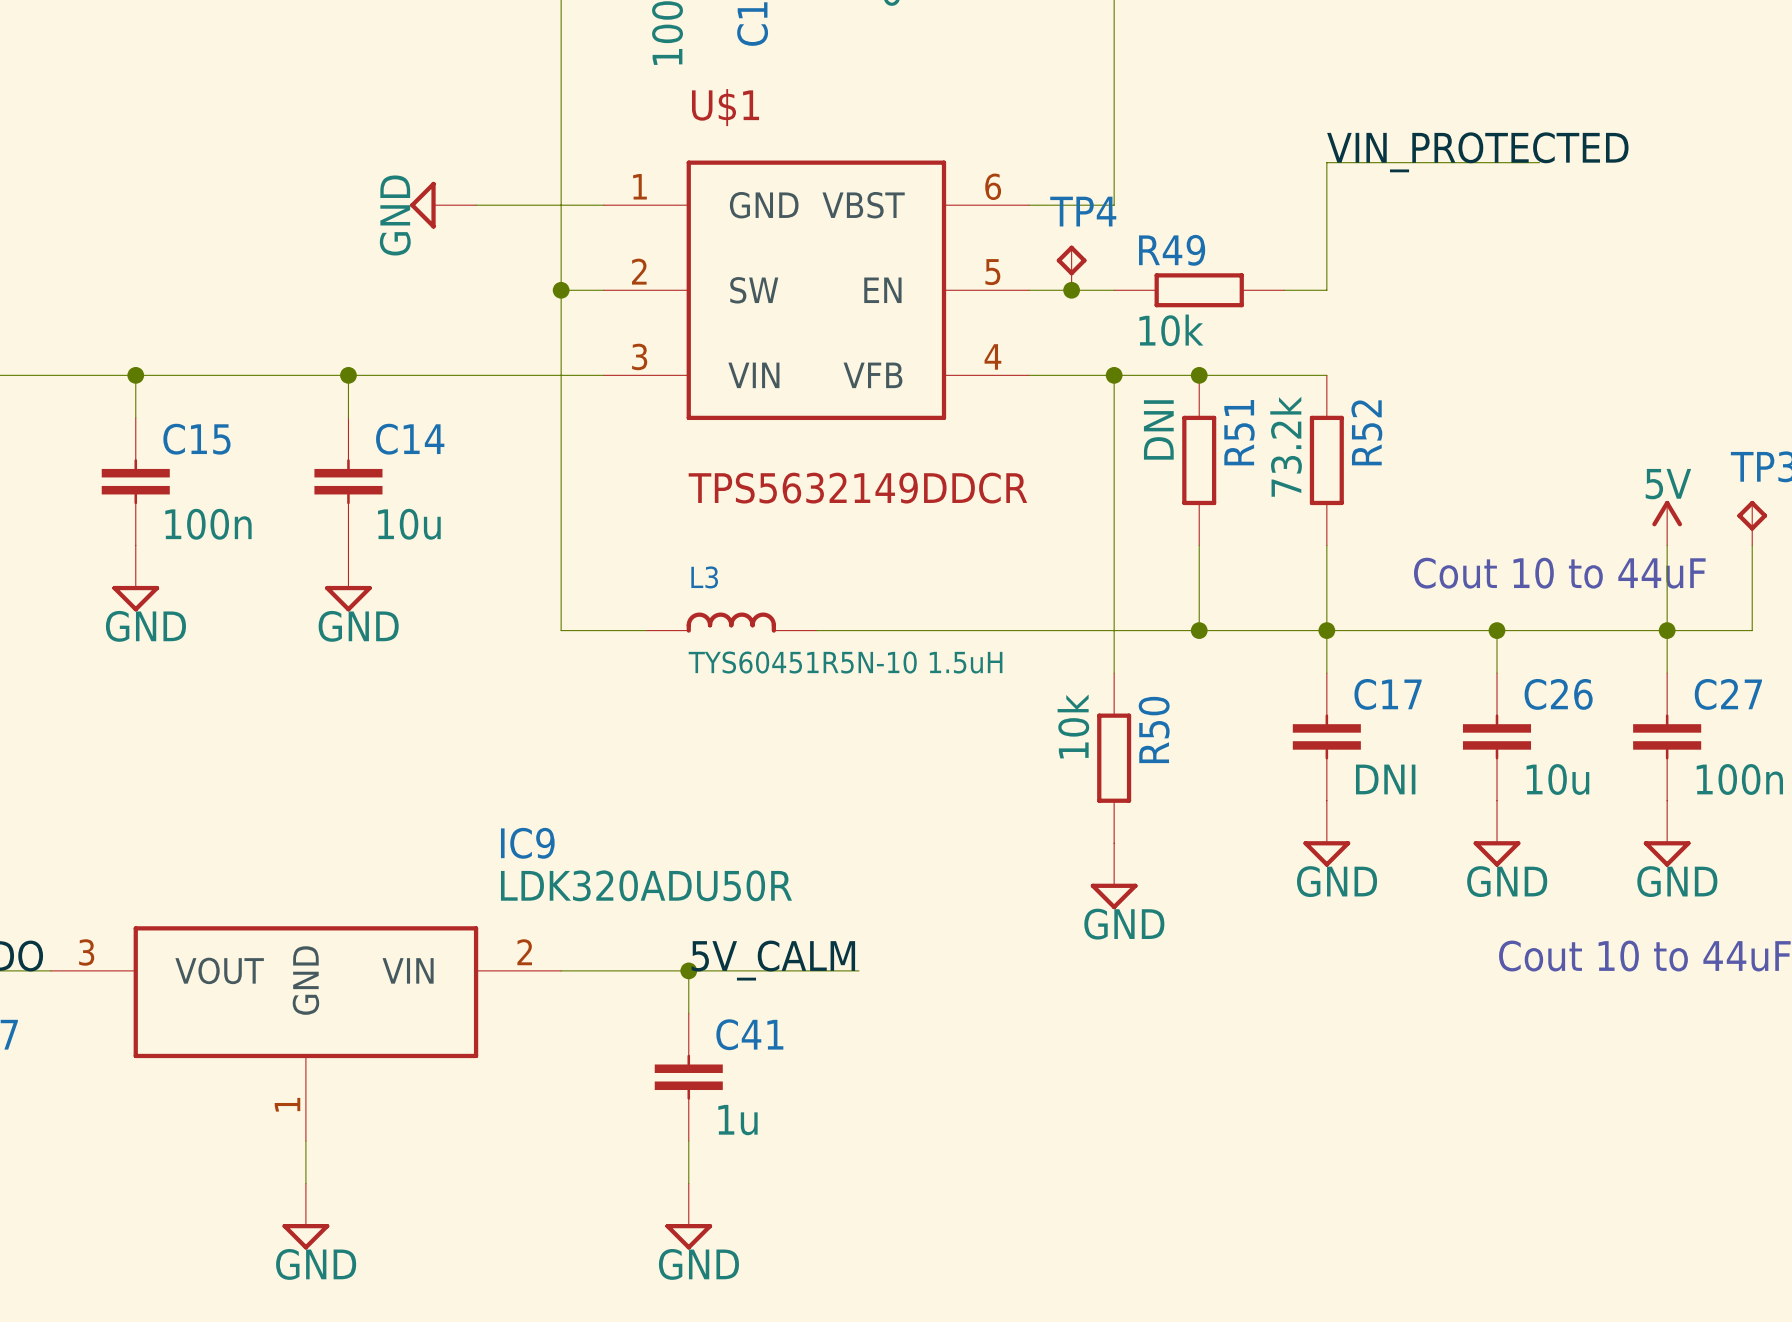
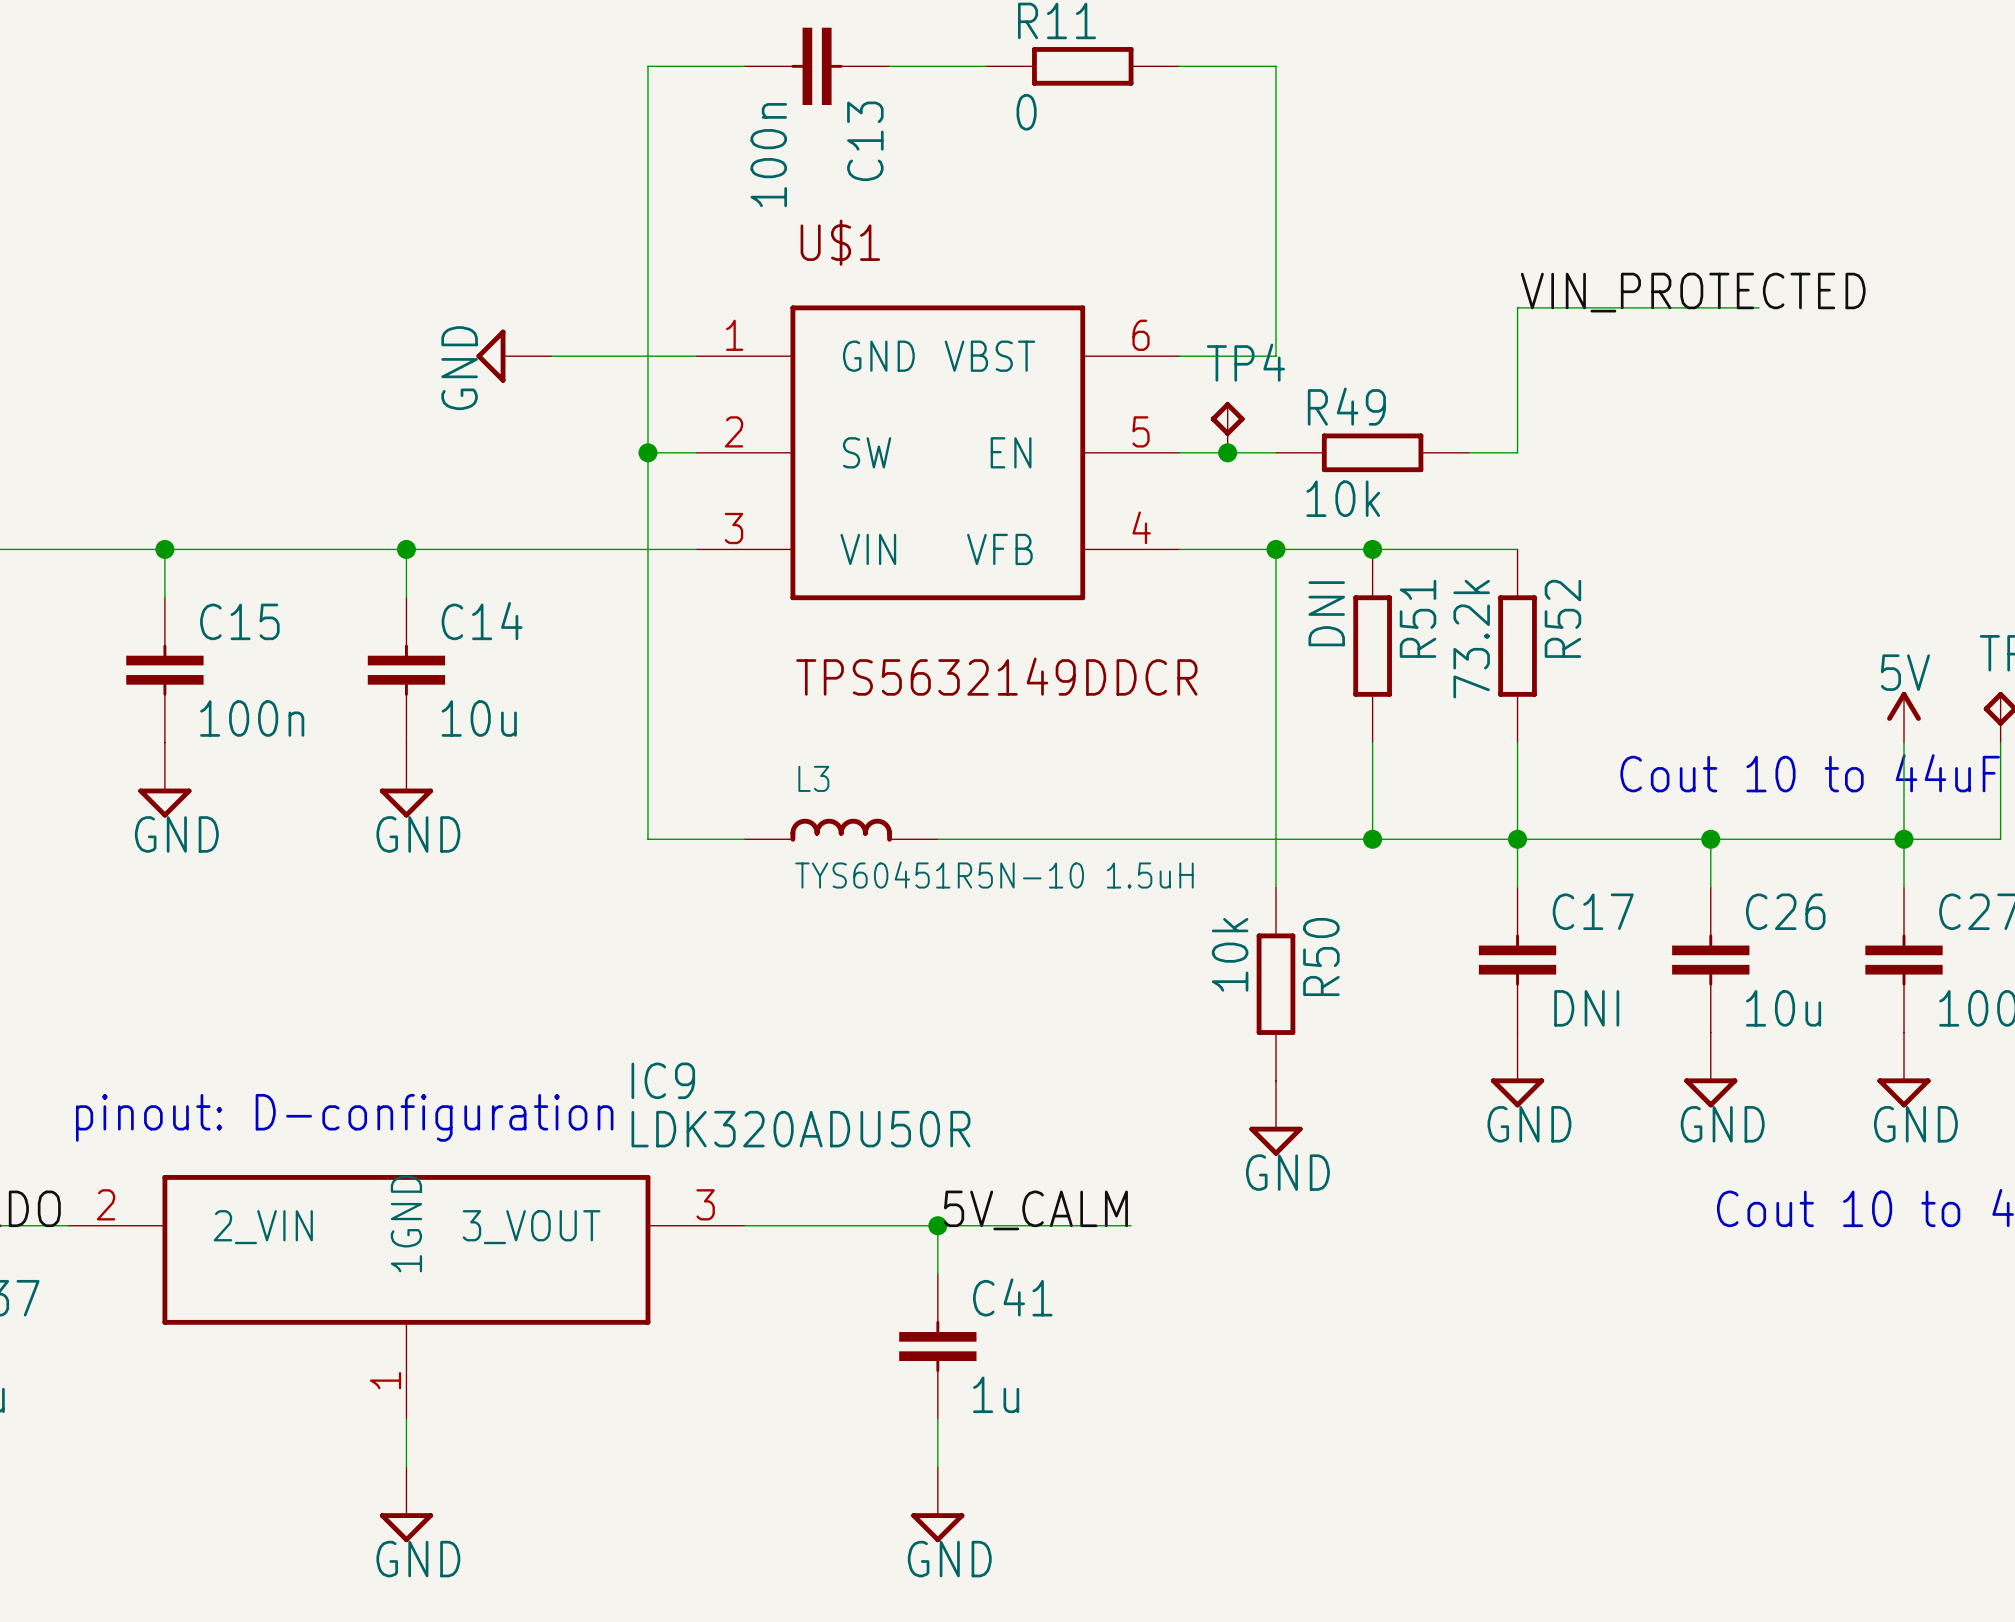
text: none -> pinout: D-configuration (344, 1117)
IC9 symbol: [50, 926, 562, 1142] -> [68, 1175, 745, 1419]
label position: 5V_CALM (773, 960) -> 5V_CALM (1035, 1210)
wire: (688, 970) (688, 1013) -> (937, 1225) (937, 1274)
junction: (688, 970) -> none
junction: none -> (937, 1225)
wire: none -> (986, 1225) (1131, 1225)
C41 position: (688, 1077) -> (937, 1346)
wire: (305, 1141) (305, 1183) -> (406, 1418) (406, 1467)
wire: (688, 1141) (688, 1183) -> (937, 1418) (937, 1467)
power symbol position: GND (305, 1216) -> GND (406, 1504)
power symbol position: GND (688, 1216) -> GND (937, 1504)

